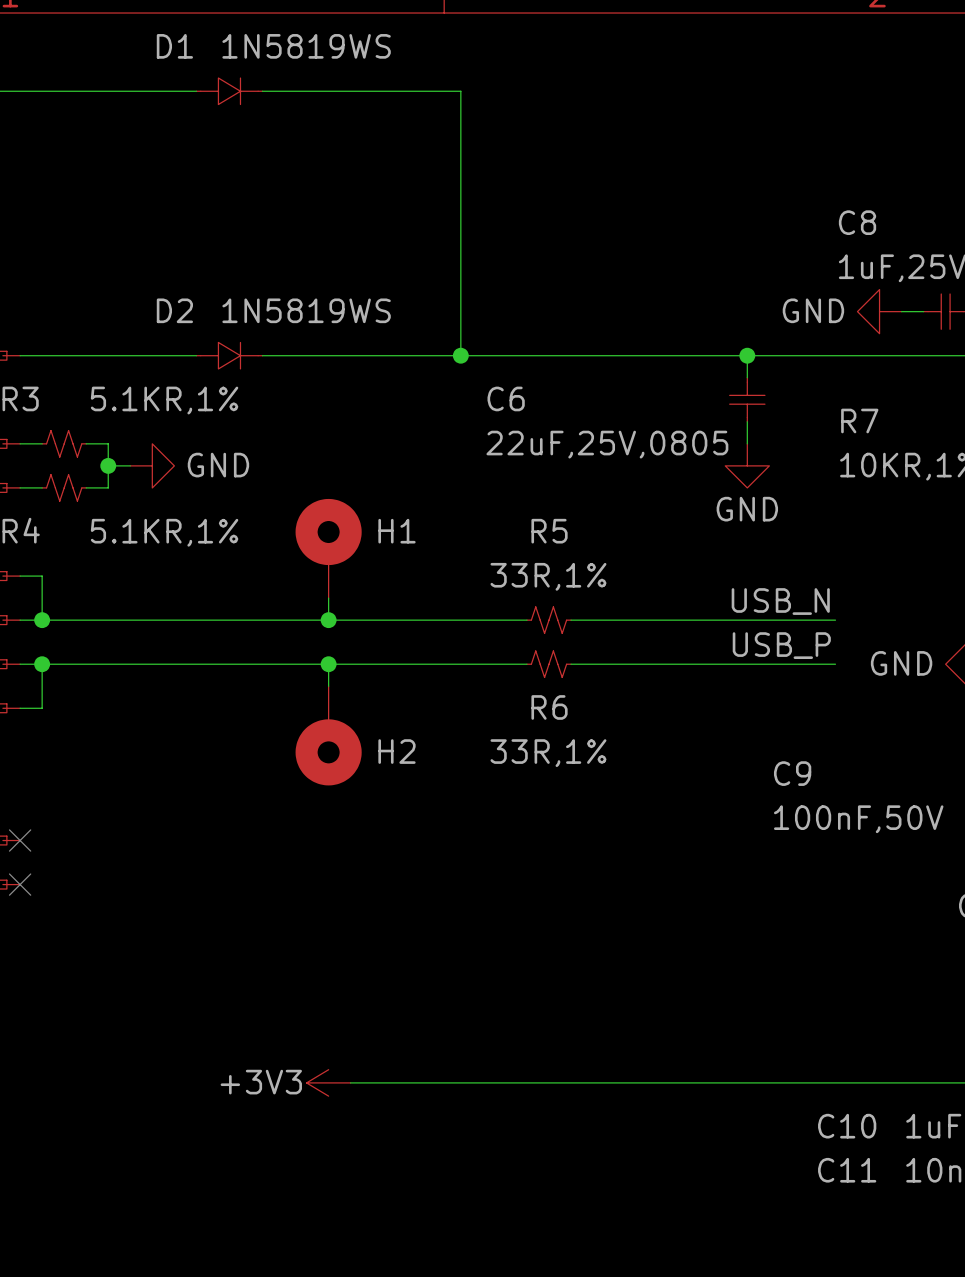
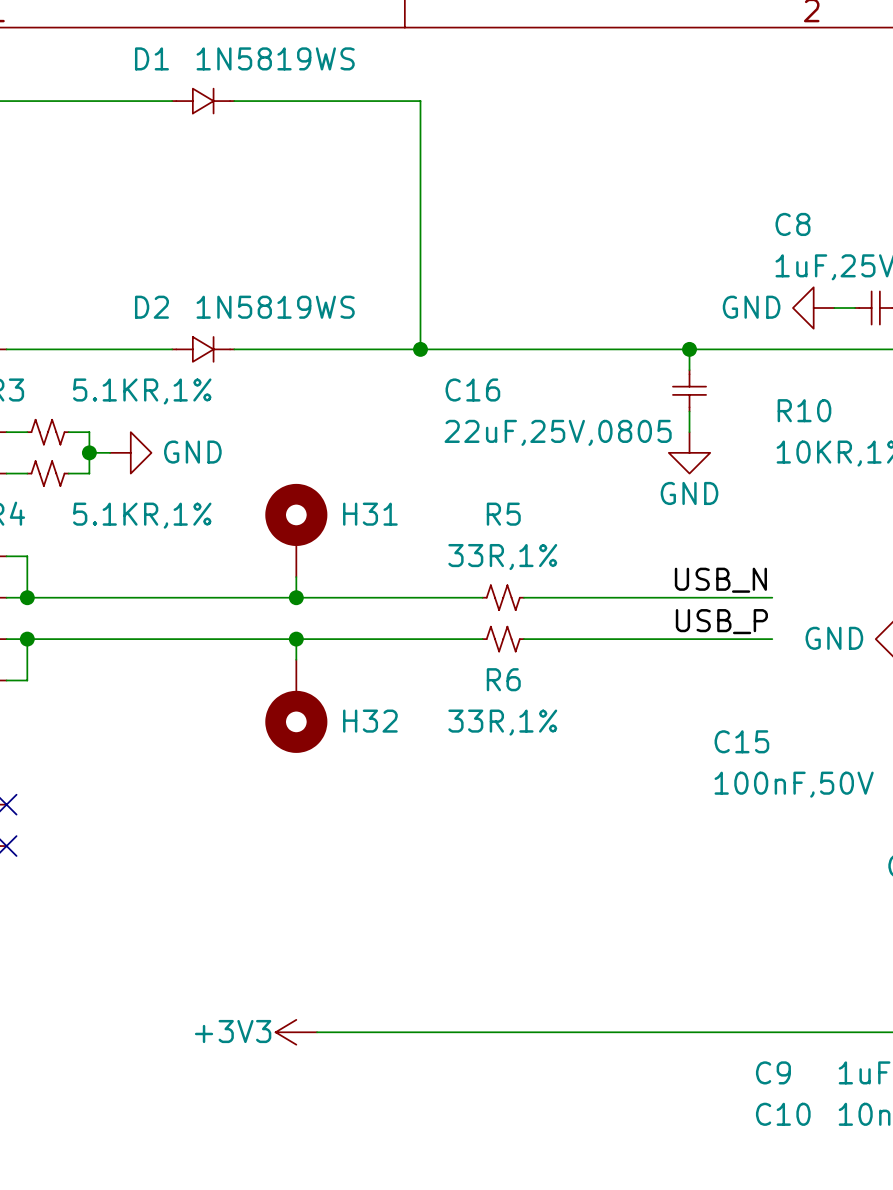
C6 name: C6 (506, 398) -> C16 (472, 390)
R7 name: R7 (859, 420) -> R10 (804, 410)
H1 name: H1 (397, 531) -> H31 (370, 514)
H2 name: H2 (397, 751) -> H32 (370, 721)
C9 name: C9 (792, 773) -> C15 (741, 741)
C10 name: C10 (847, 1126) -> C9 (773, 1072)
C11 name: C11 (847, 1170) -> C10 (783, 1114)

